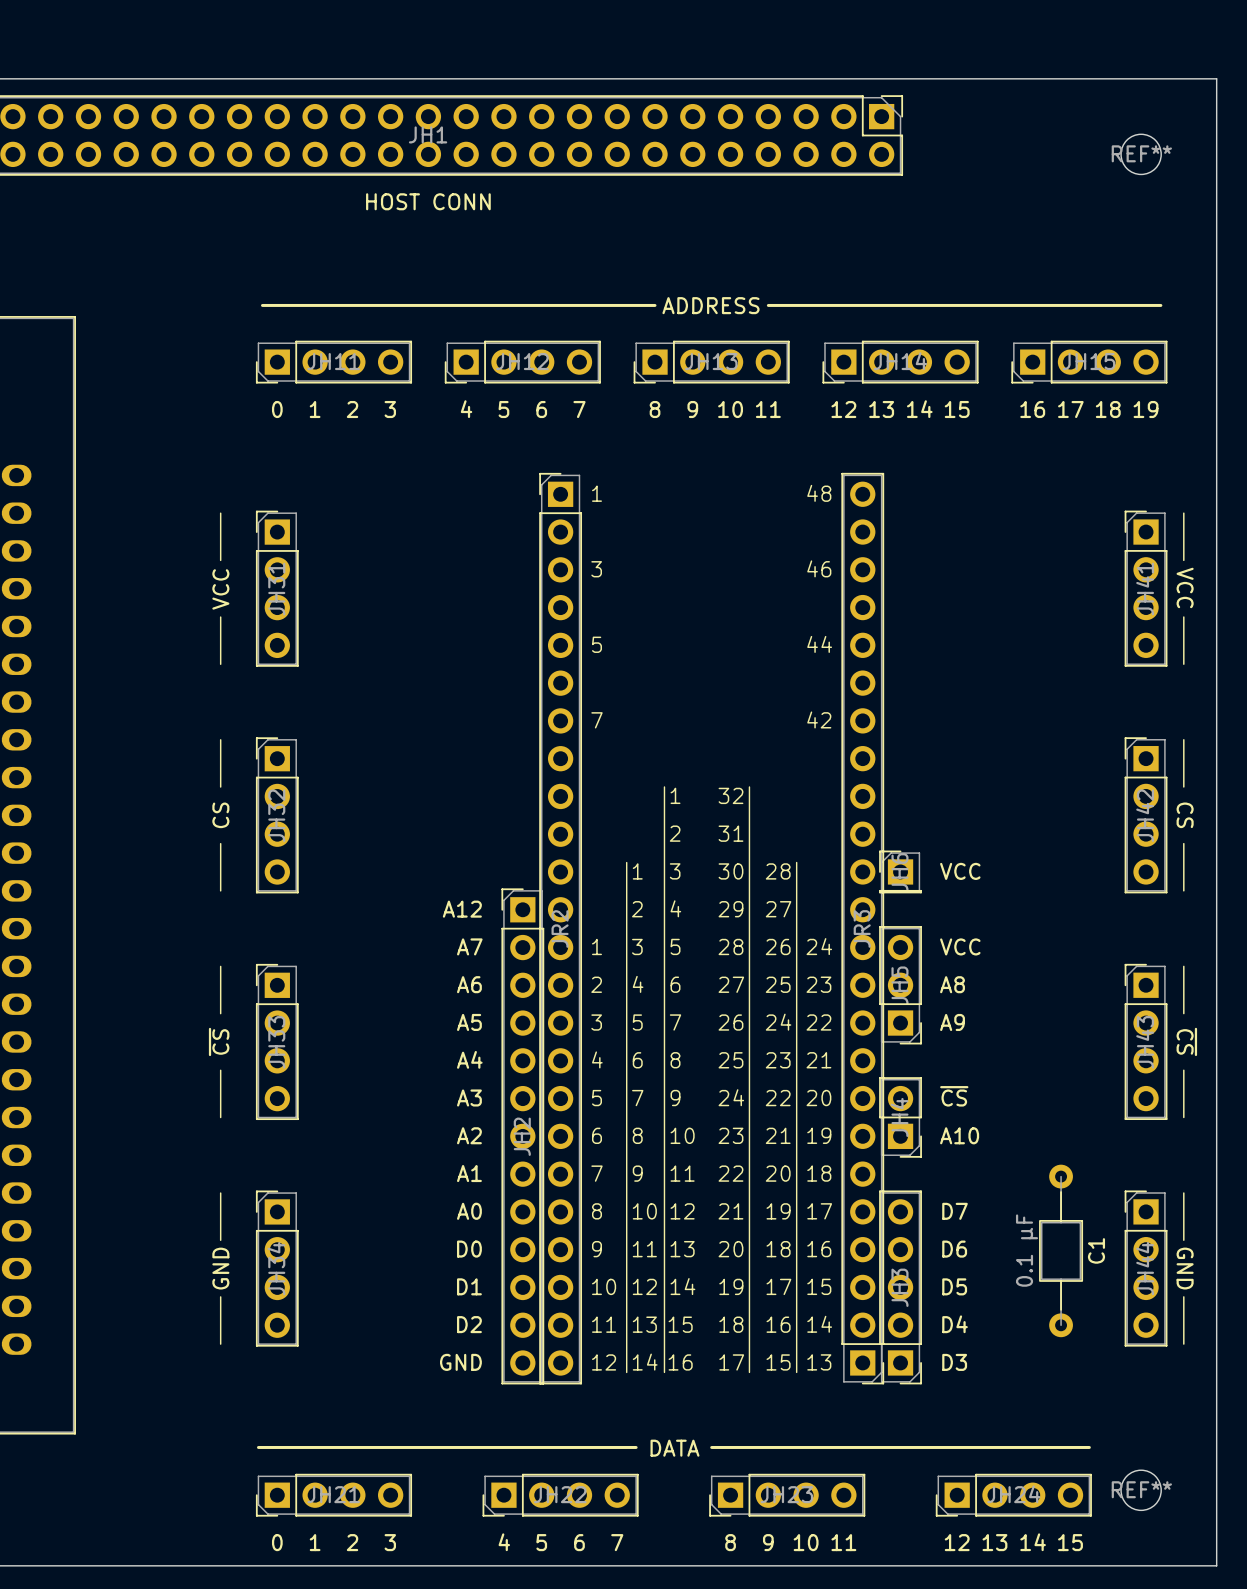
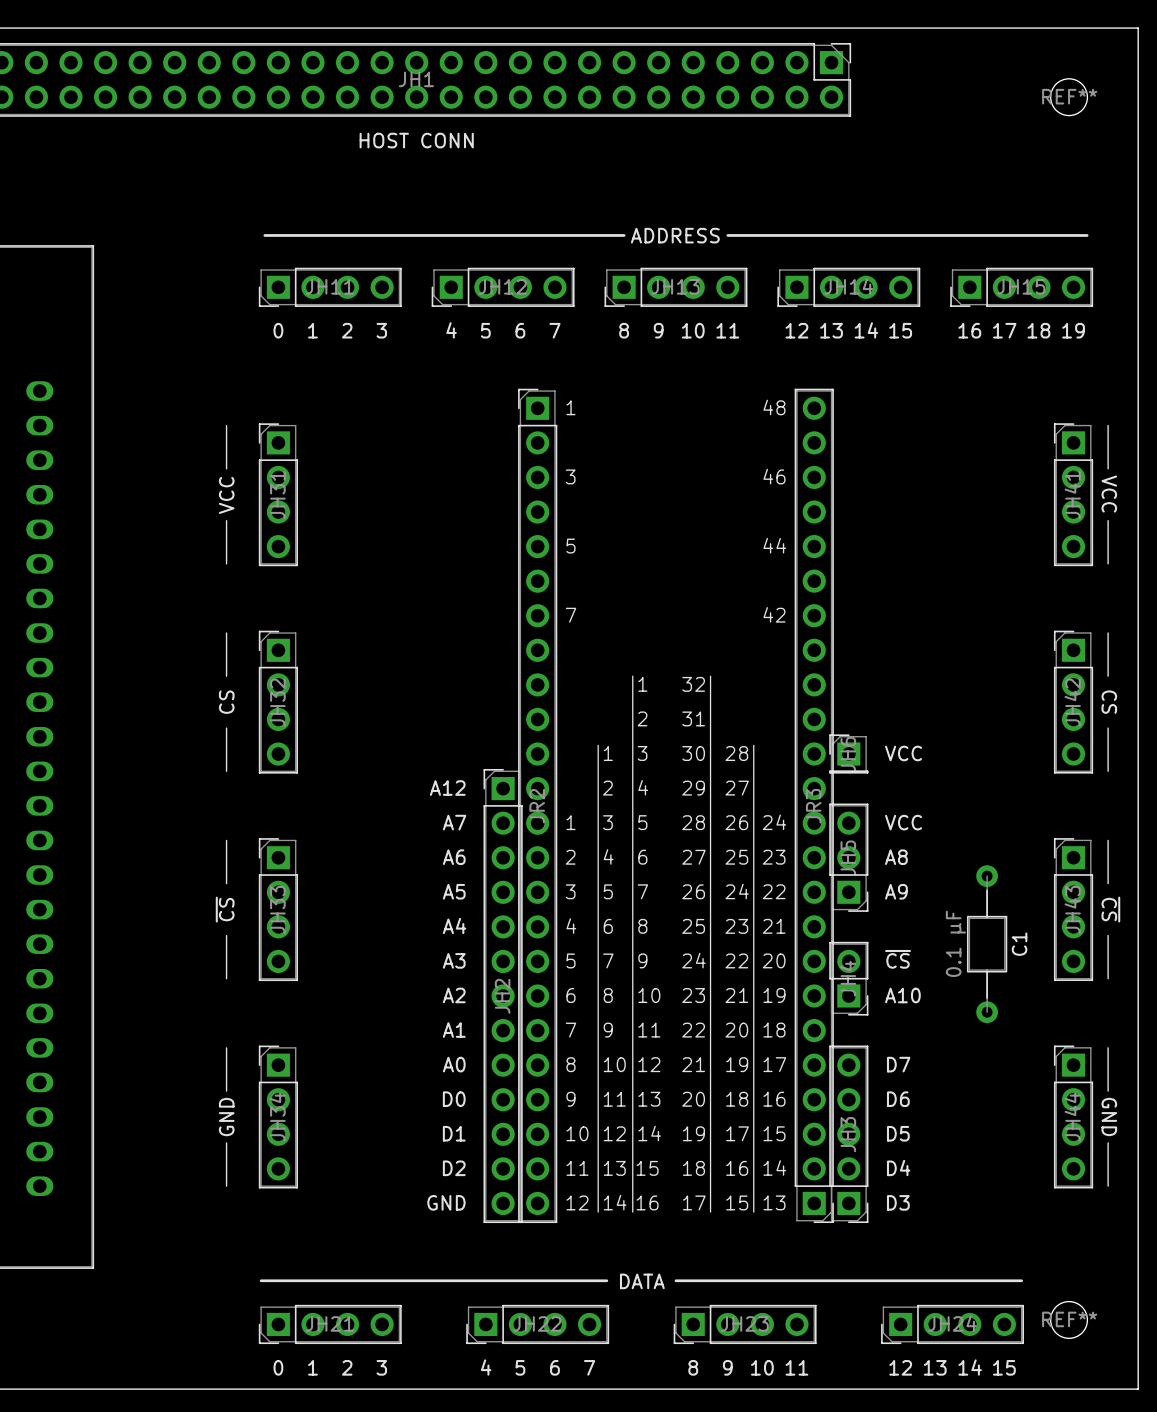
C1 position: (1061, 1250) -> (987, 944)

